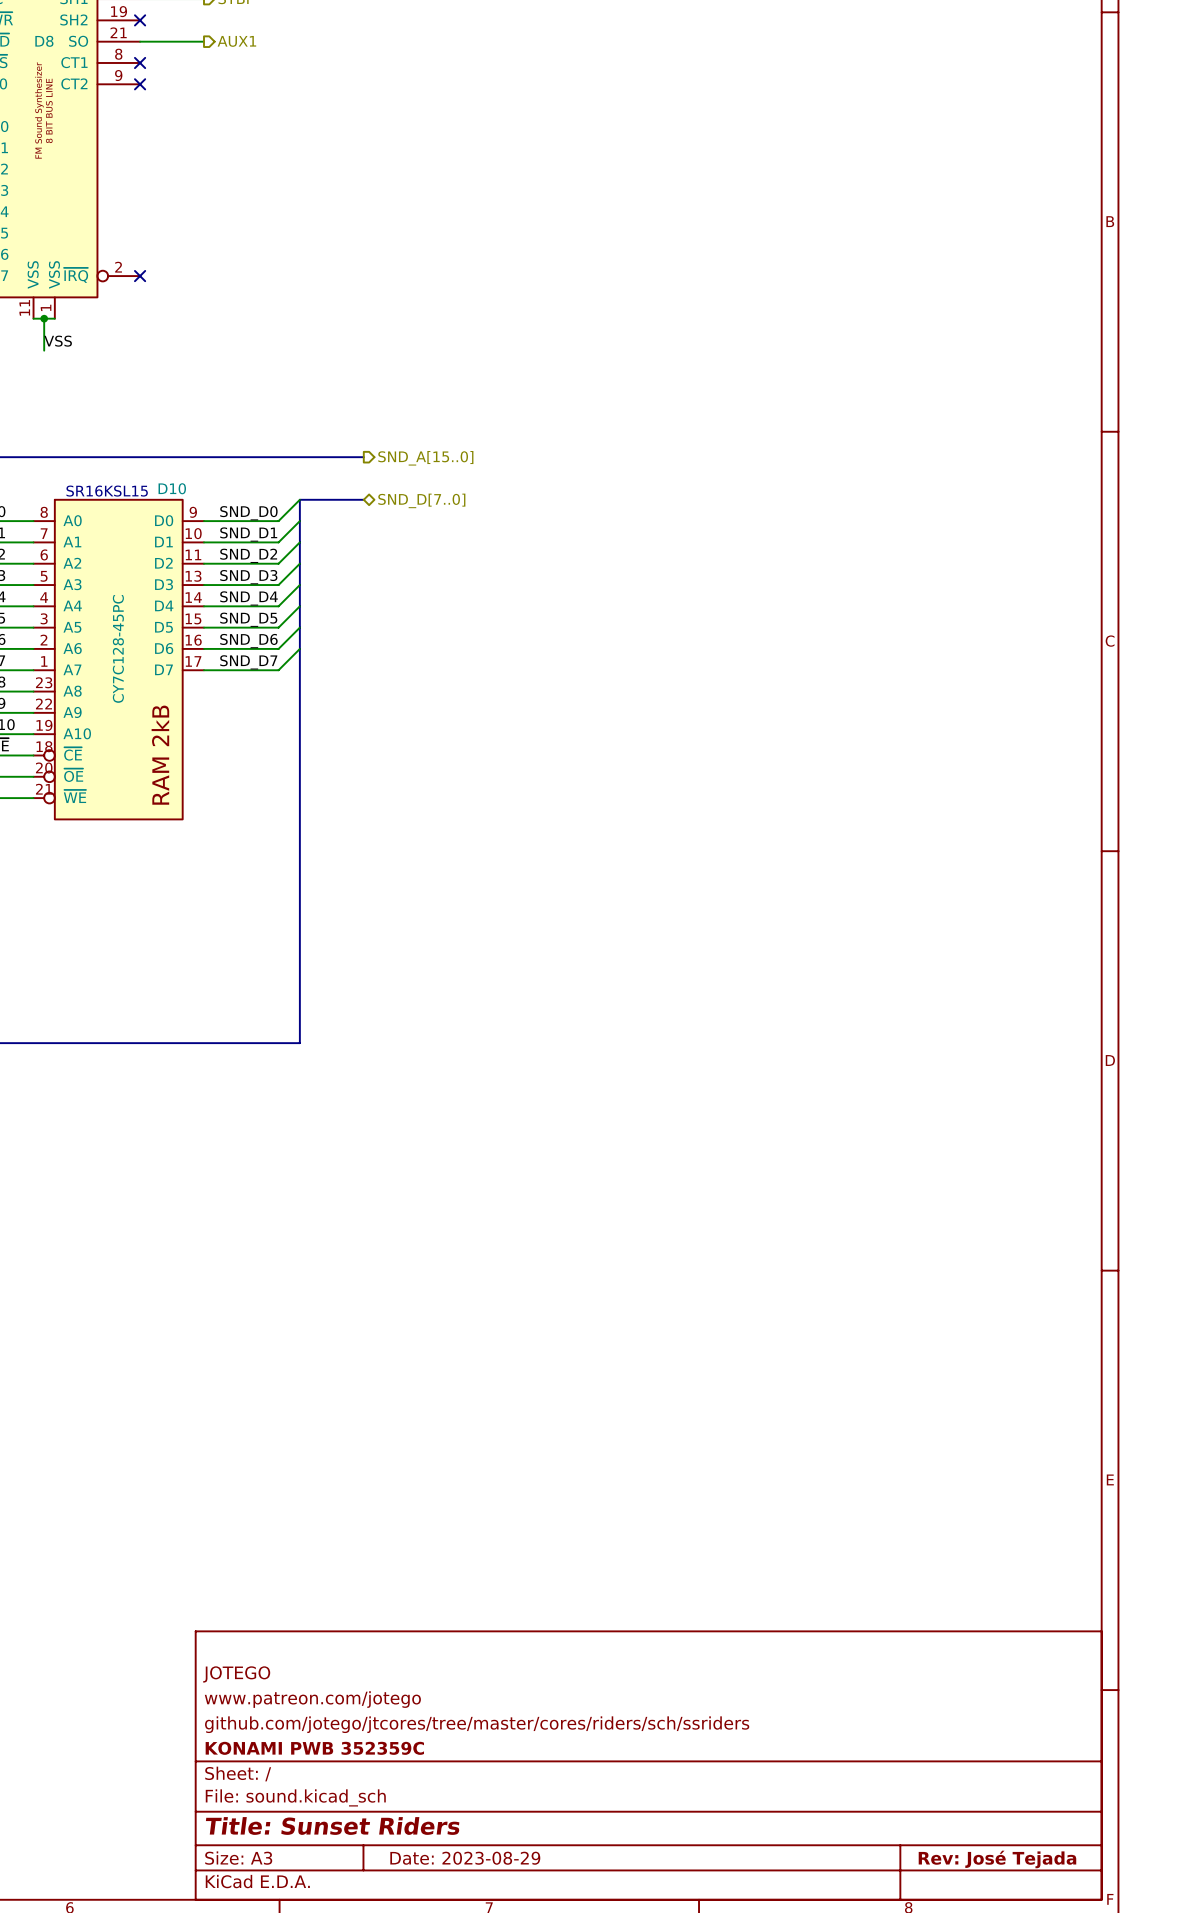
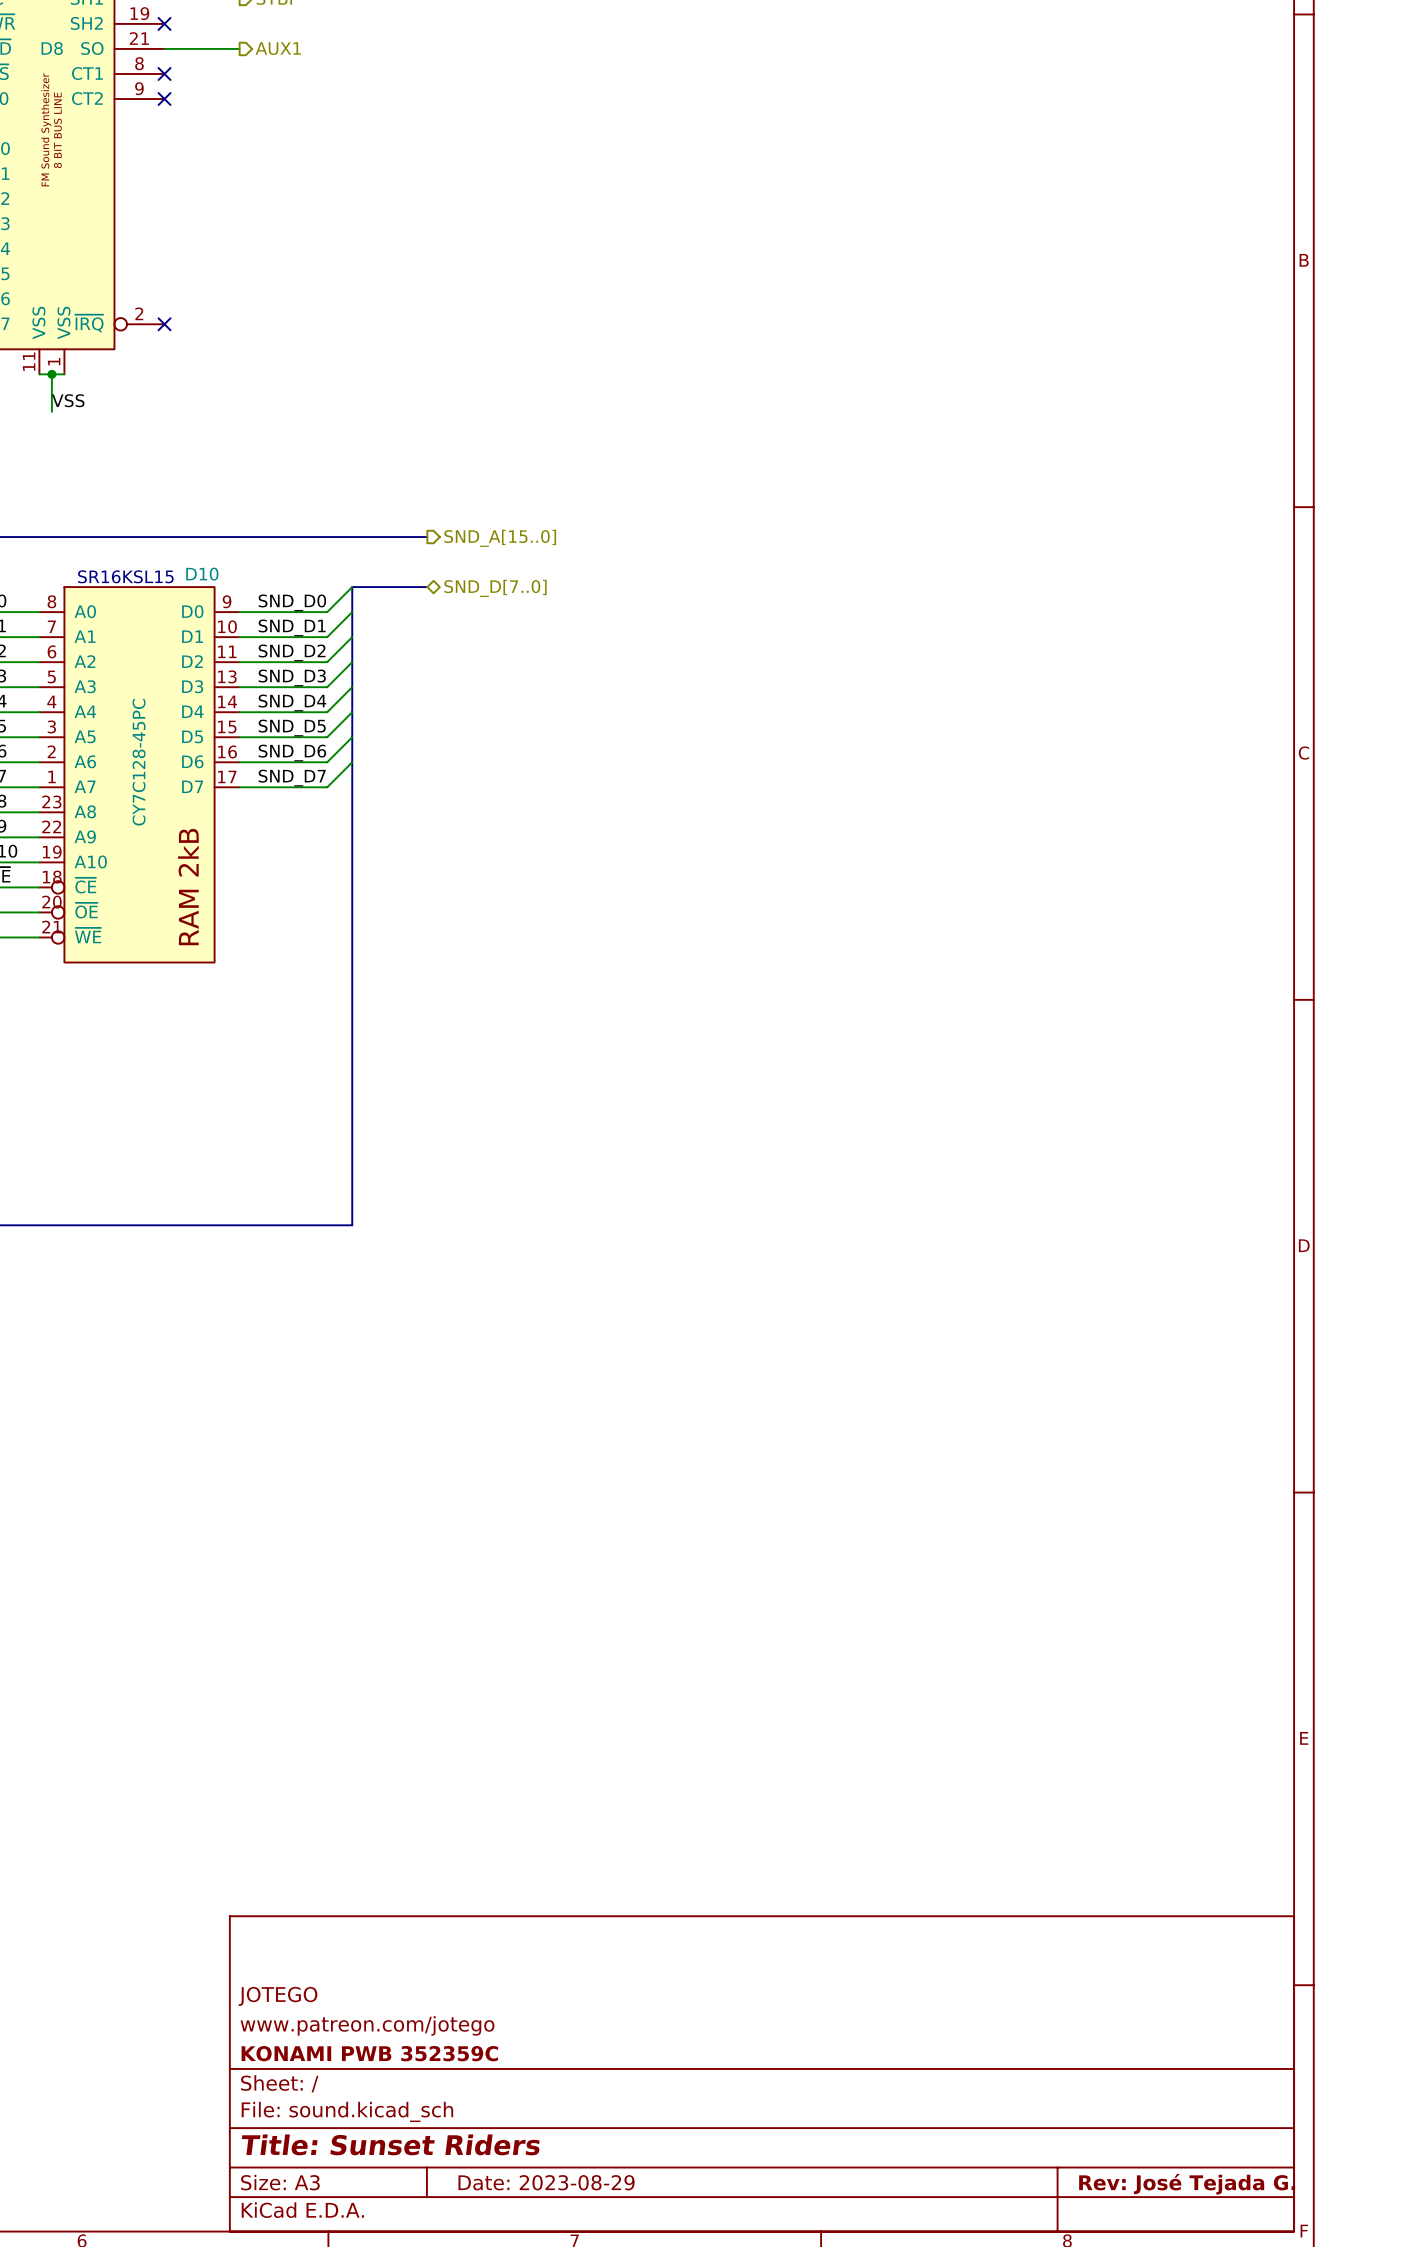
title block: JOTEGO (236, 1674) -> none
title block: www.patreon.com/jotego (312, 1699) -> JOTEGO (278, 1996)
title block: github.com/jotego/jtcores/tree/master/cores/riders/sch/ssriders (477, 1724) -> www.patreon.com/jotego (367, 2025)
title block: Rev: José Tejada (997, 1859) -> Rev: José Tejada G. (1187, 2184)

